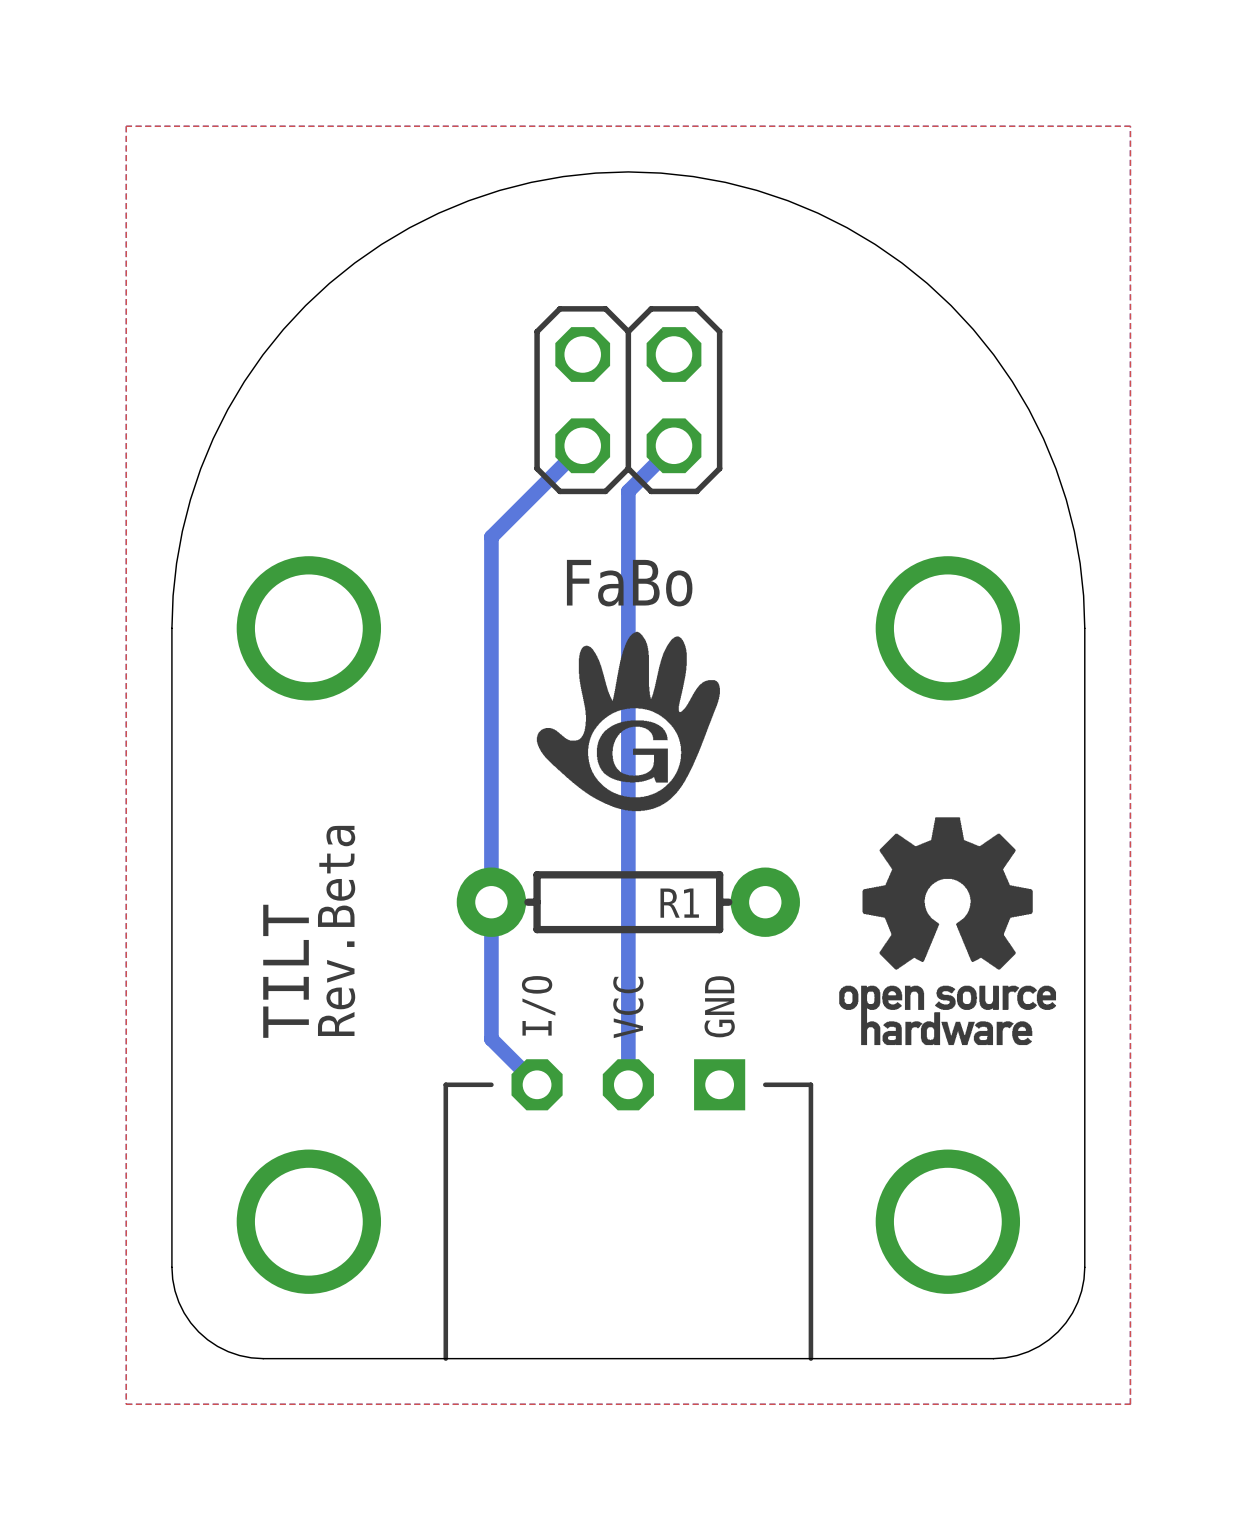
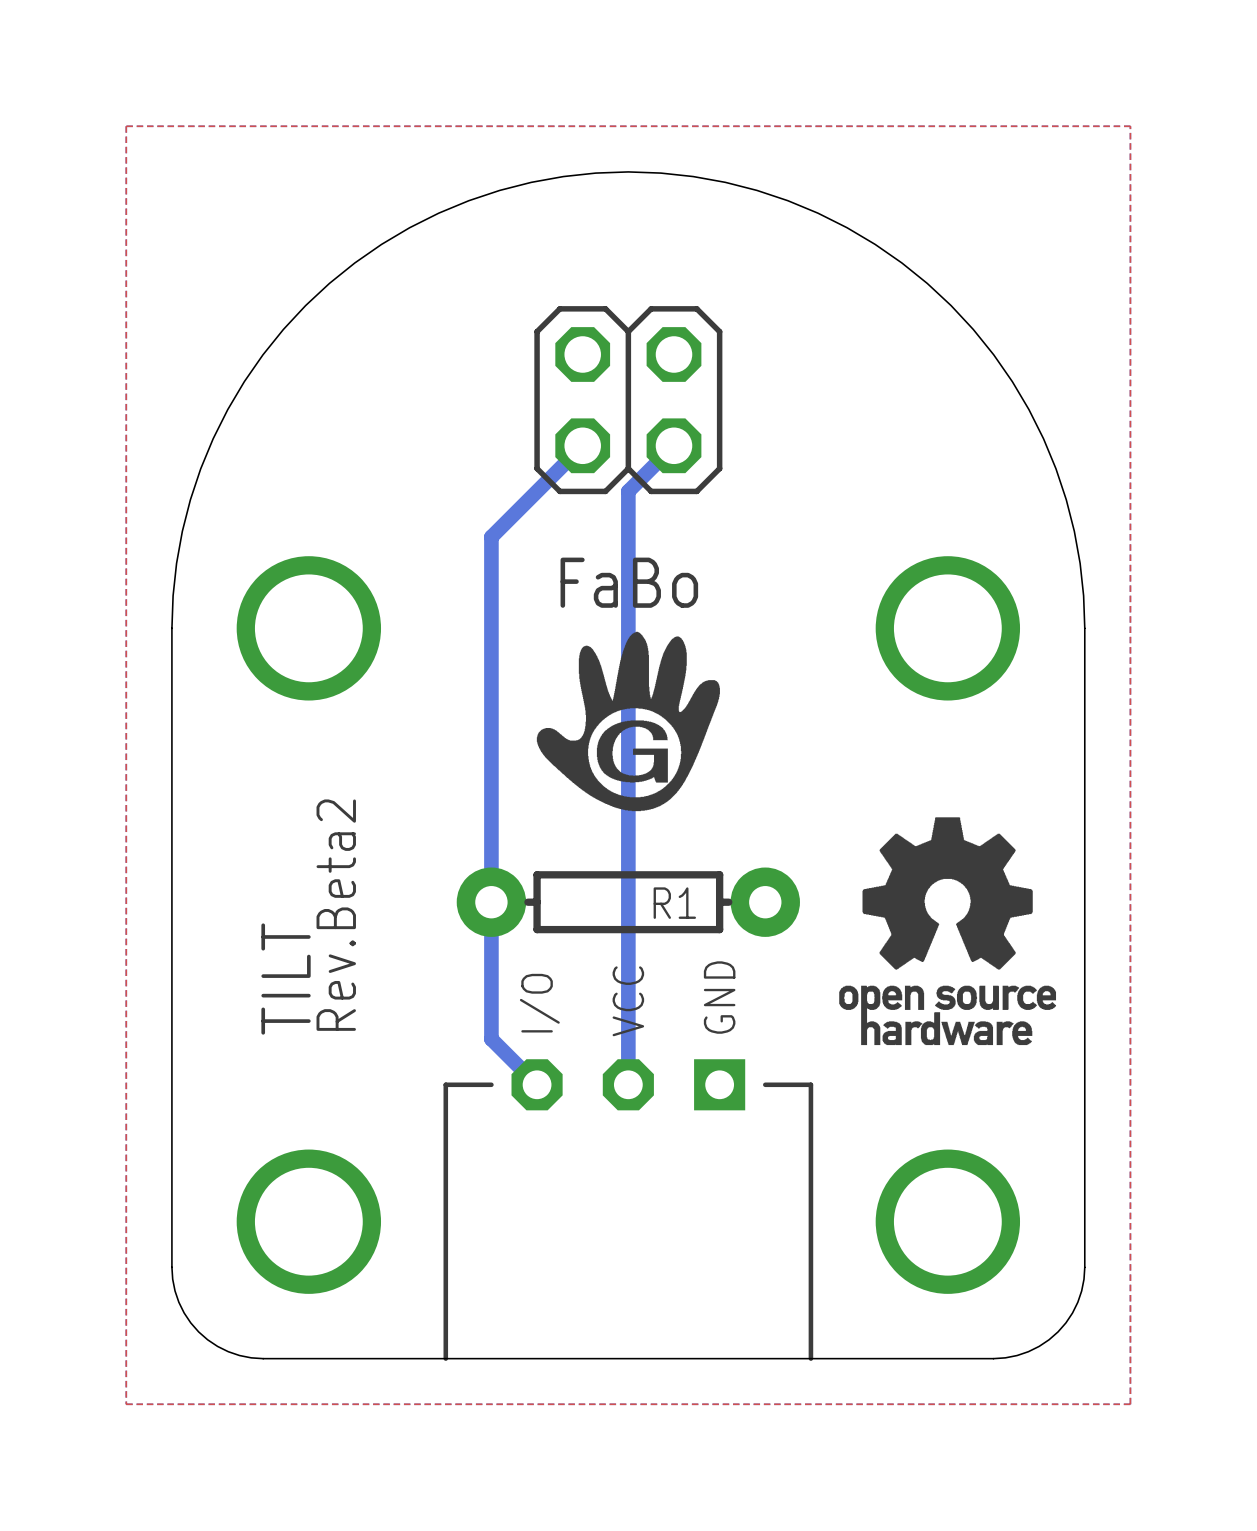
text: Rev.Beta (336, 930) -> Rev.Beta2 (336, 915)

